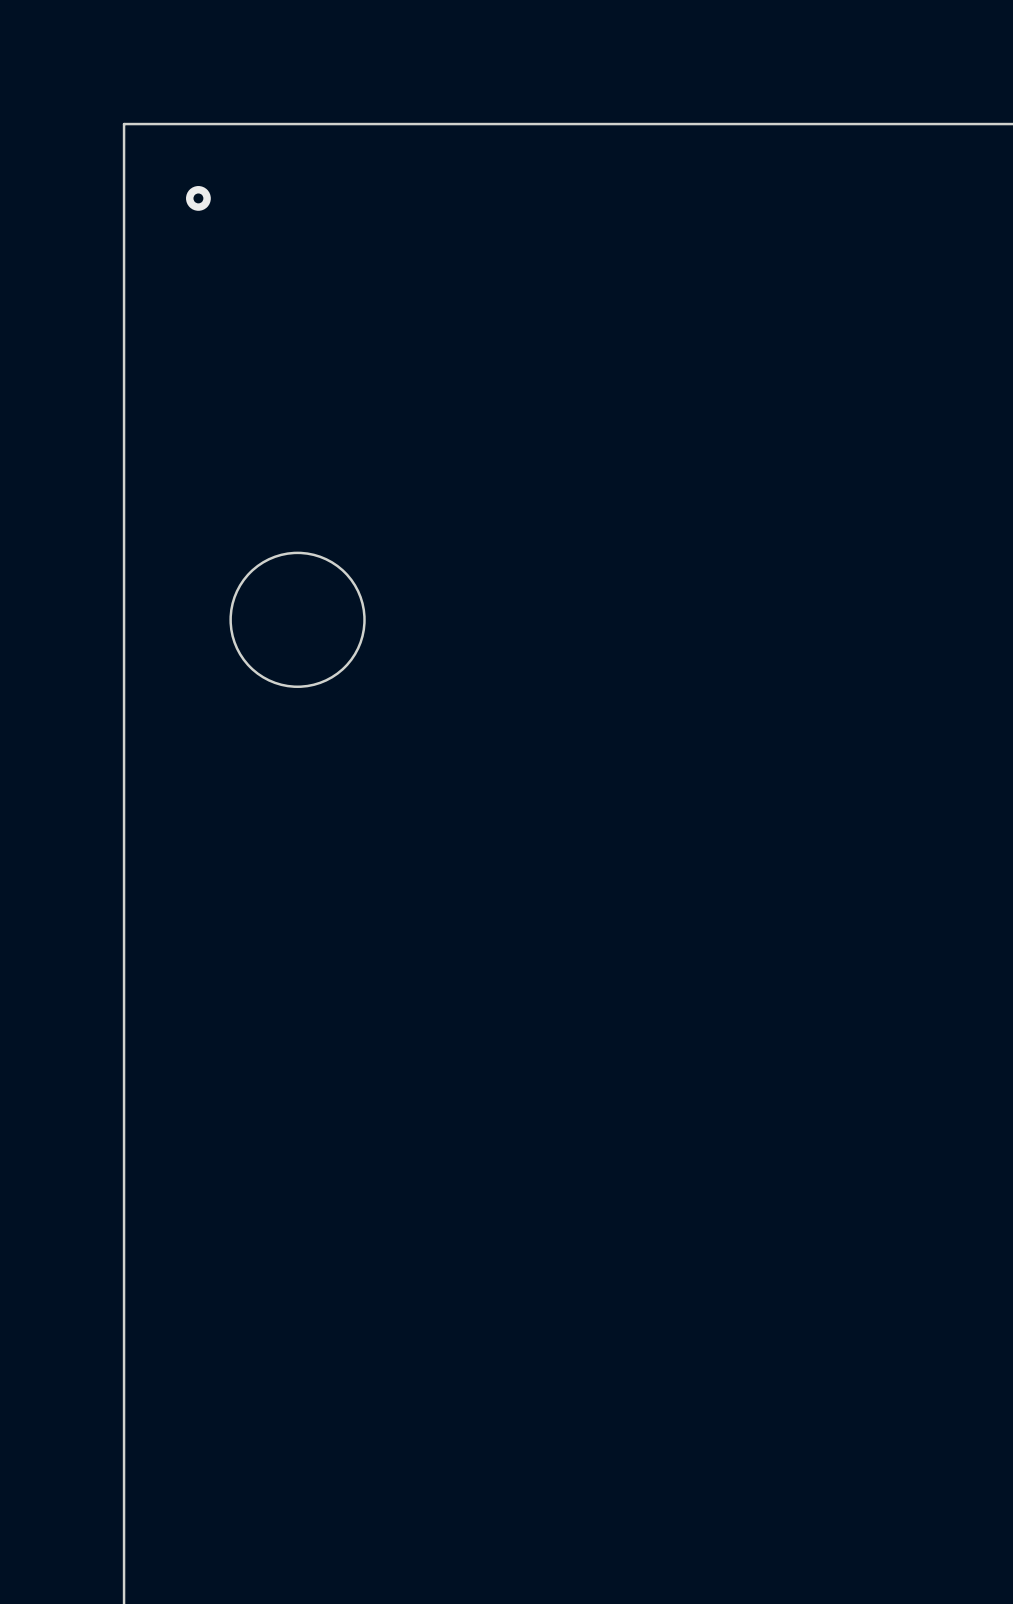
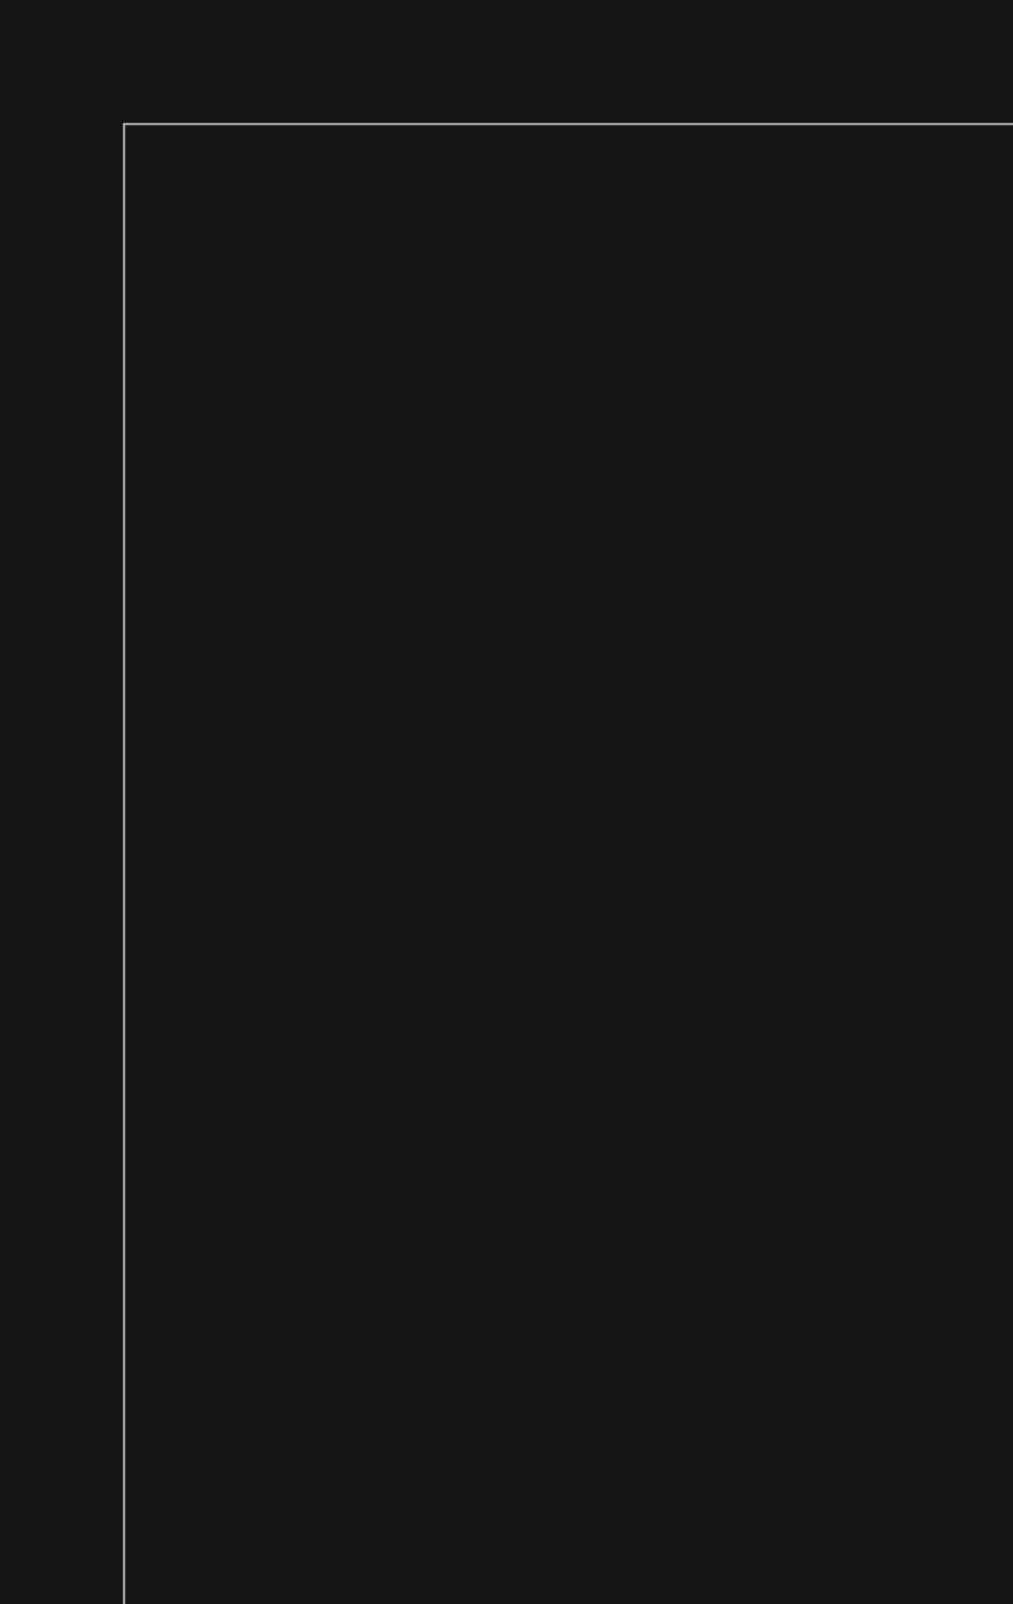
via: (198, 198) -> none
round board edge: [229, 551, 366, 688] -> none

